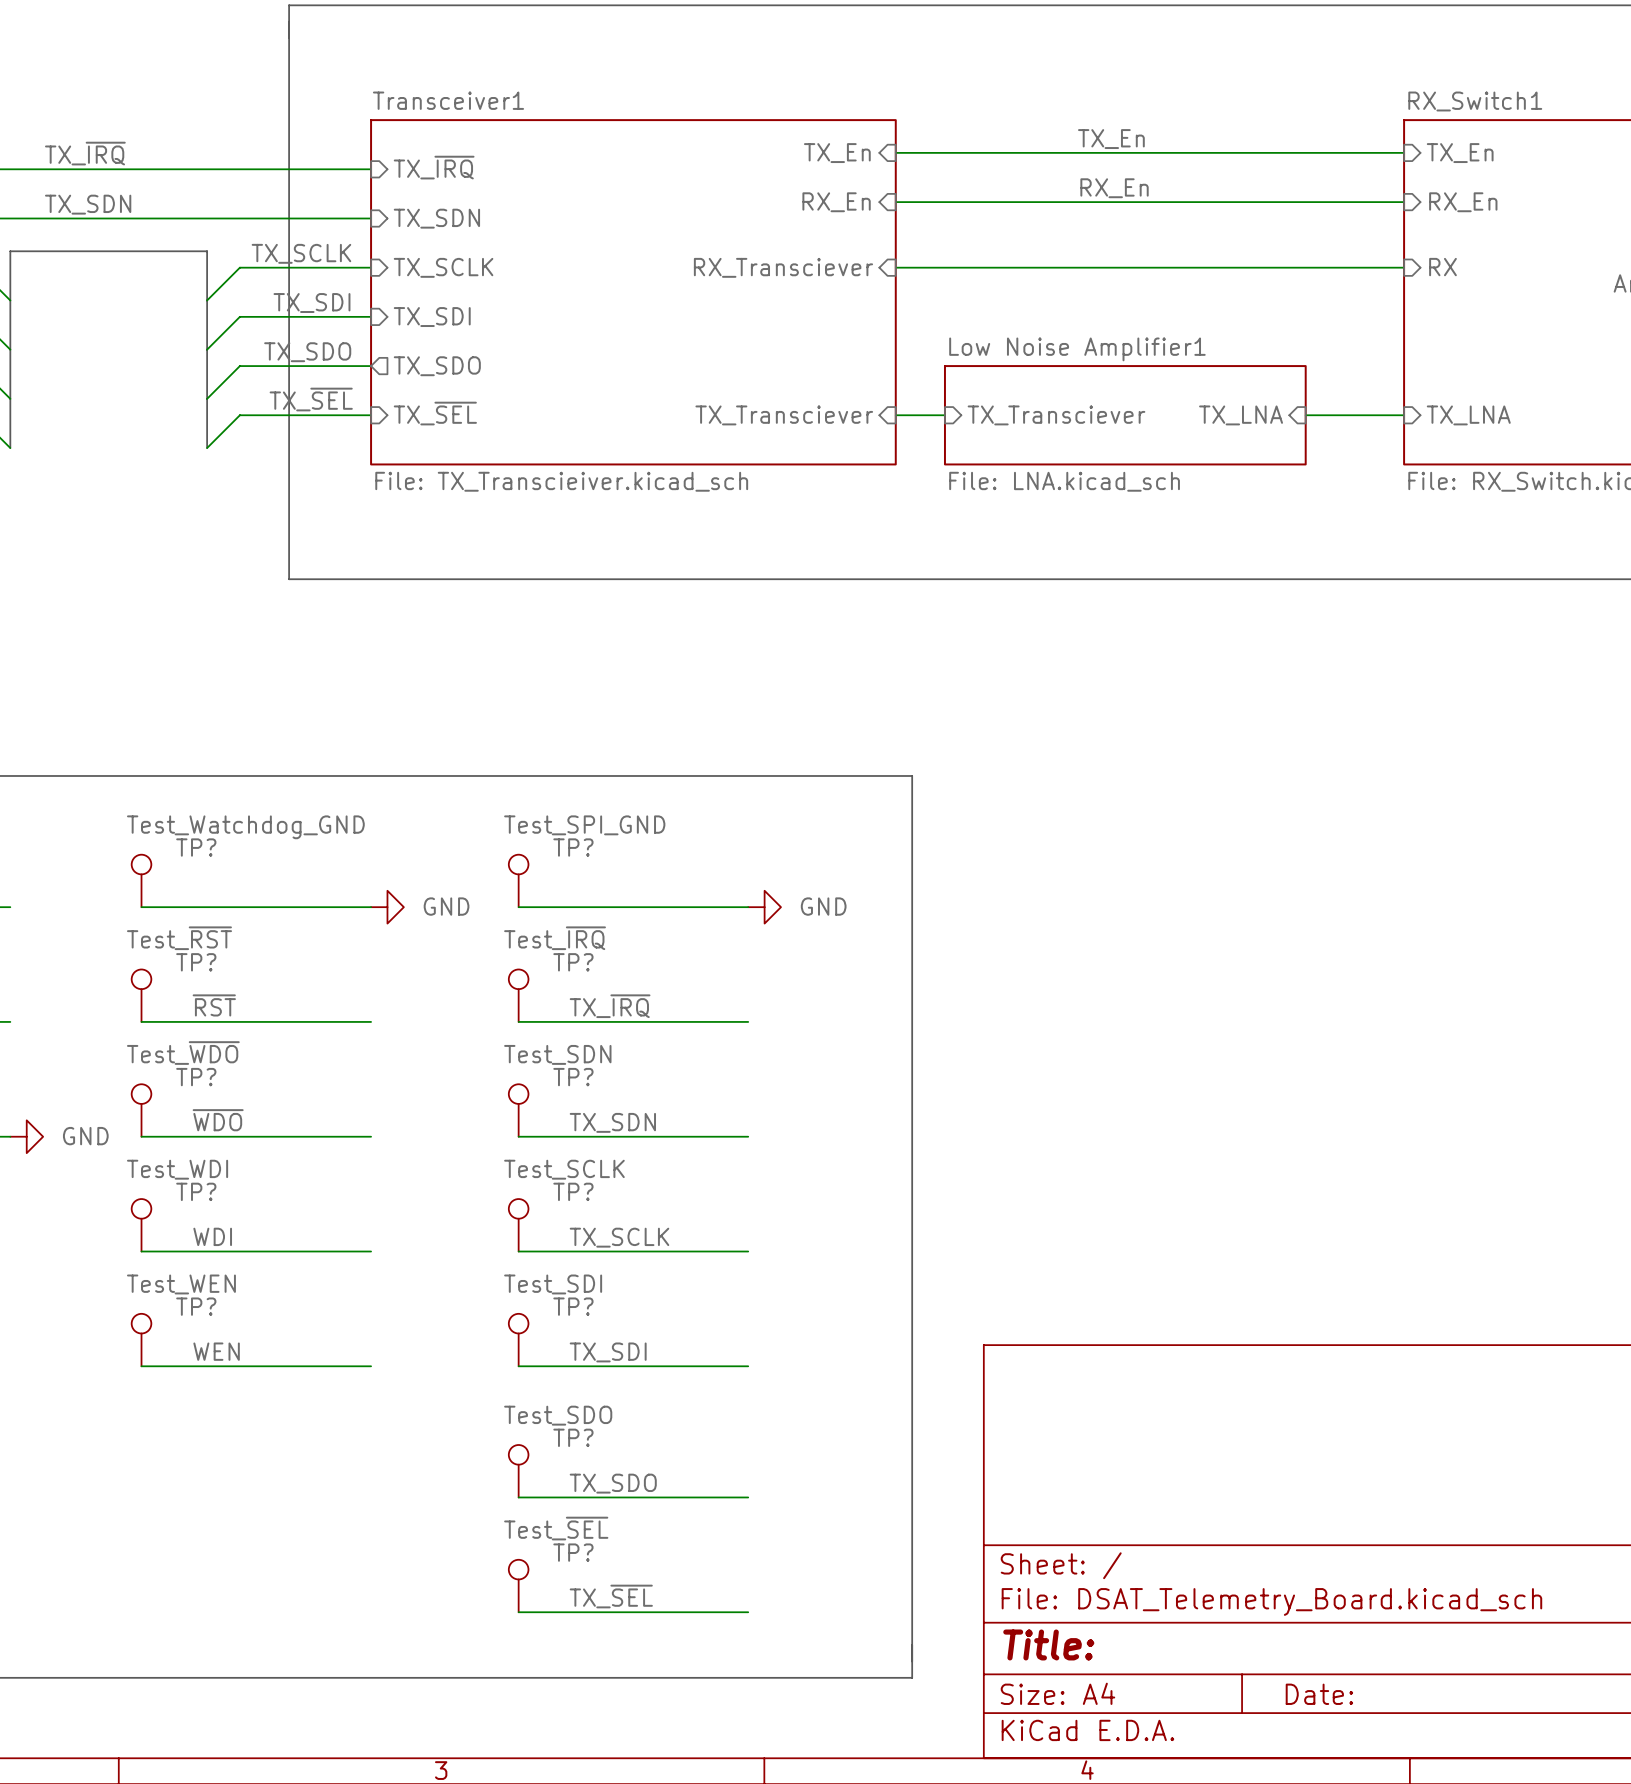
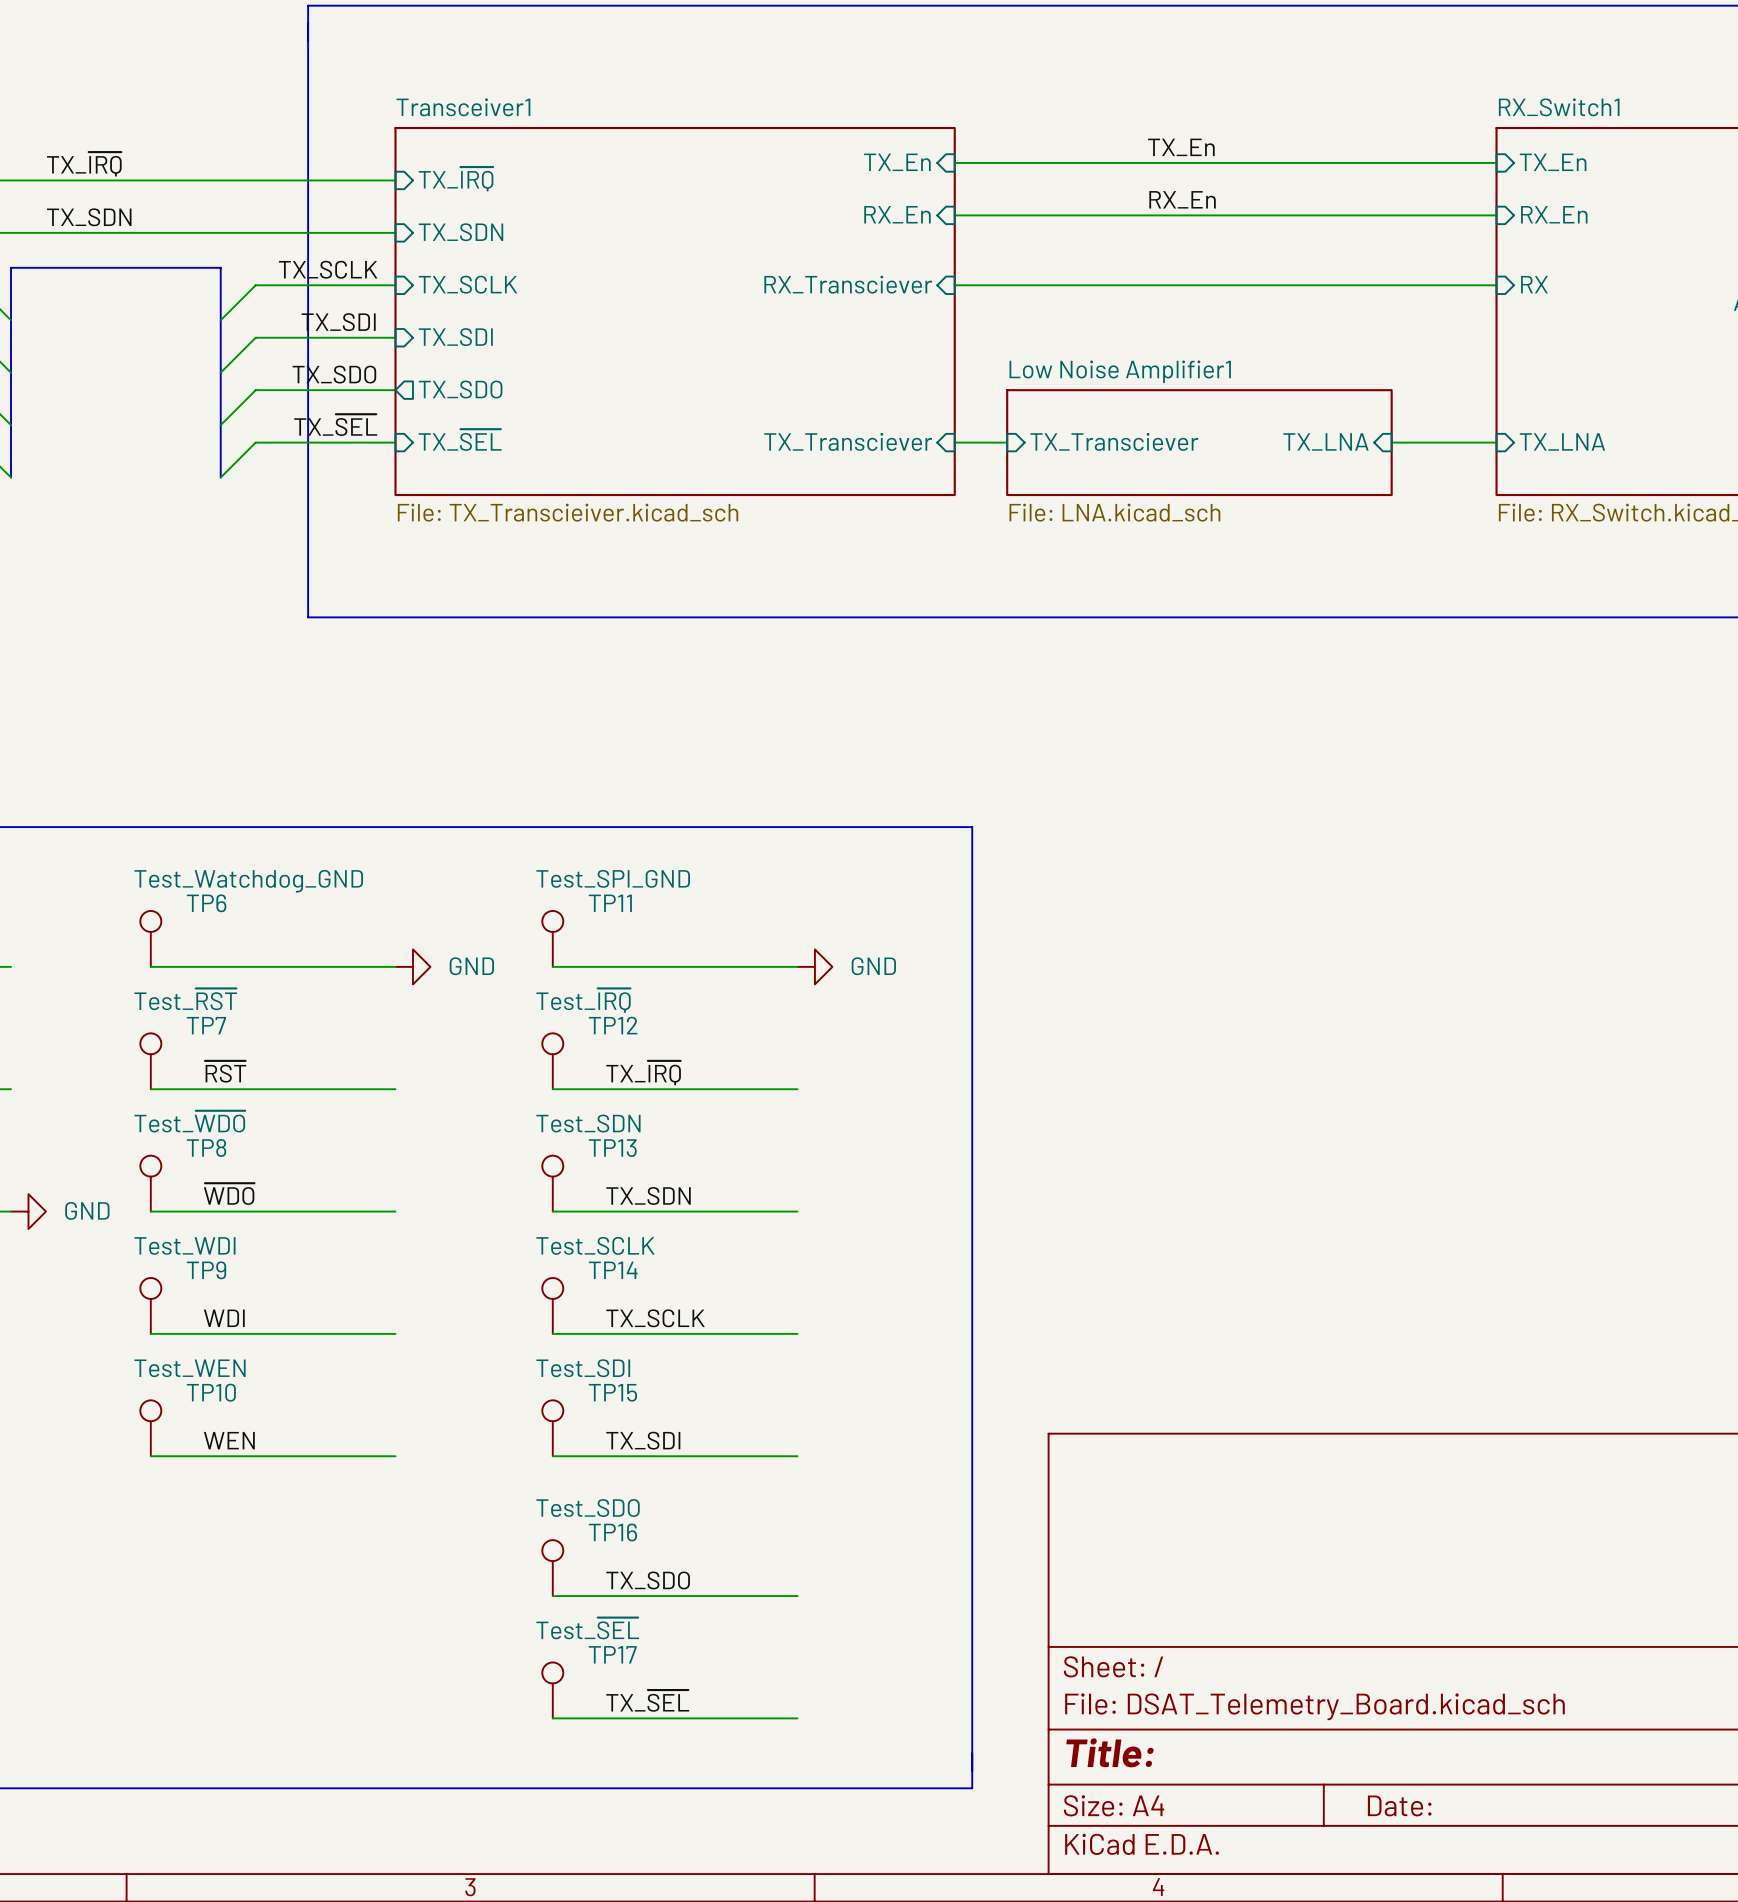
TP? name: TP? (196, 847) -> TP6 (206, 903)
TP? name: TP? (573, 847) -> TP11 (610, 903)
TP? name: TP? (196, 962) -> TP7 (206, 1025)
TP? name: TP? (573, 962) -> TP12 (613, 1025)
TP? name: TP? (196, 1077) -> TP8 (206, 1147)
TP? name: TP? (573, 1077) -> TP13 (612, 1148)
TP? name: TP? (196, 1191) -> TP9 (206, 1270)
TP? name: TP? (573, 1191) -> TP14 (613, 1270)
TP? name: TP? (196, 1306) -> TP10 (211, 1392)
TP? name: TP? (573, 1306) -> TP15 (612, 1392)
TP? name: TP? (573, 1437) -> TP16 (612, 1532)
TP? name: TP? (573, 1552) -> TP17 (612, 1654)

